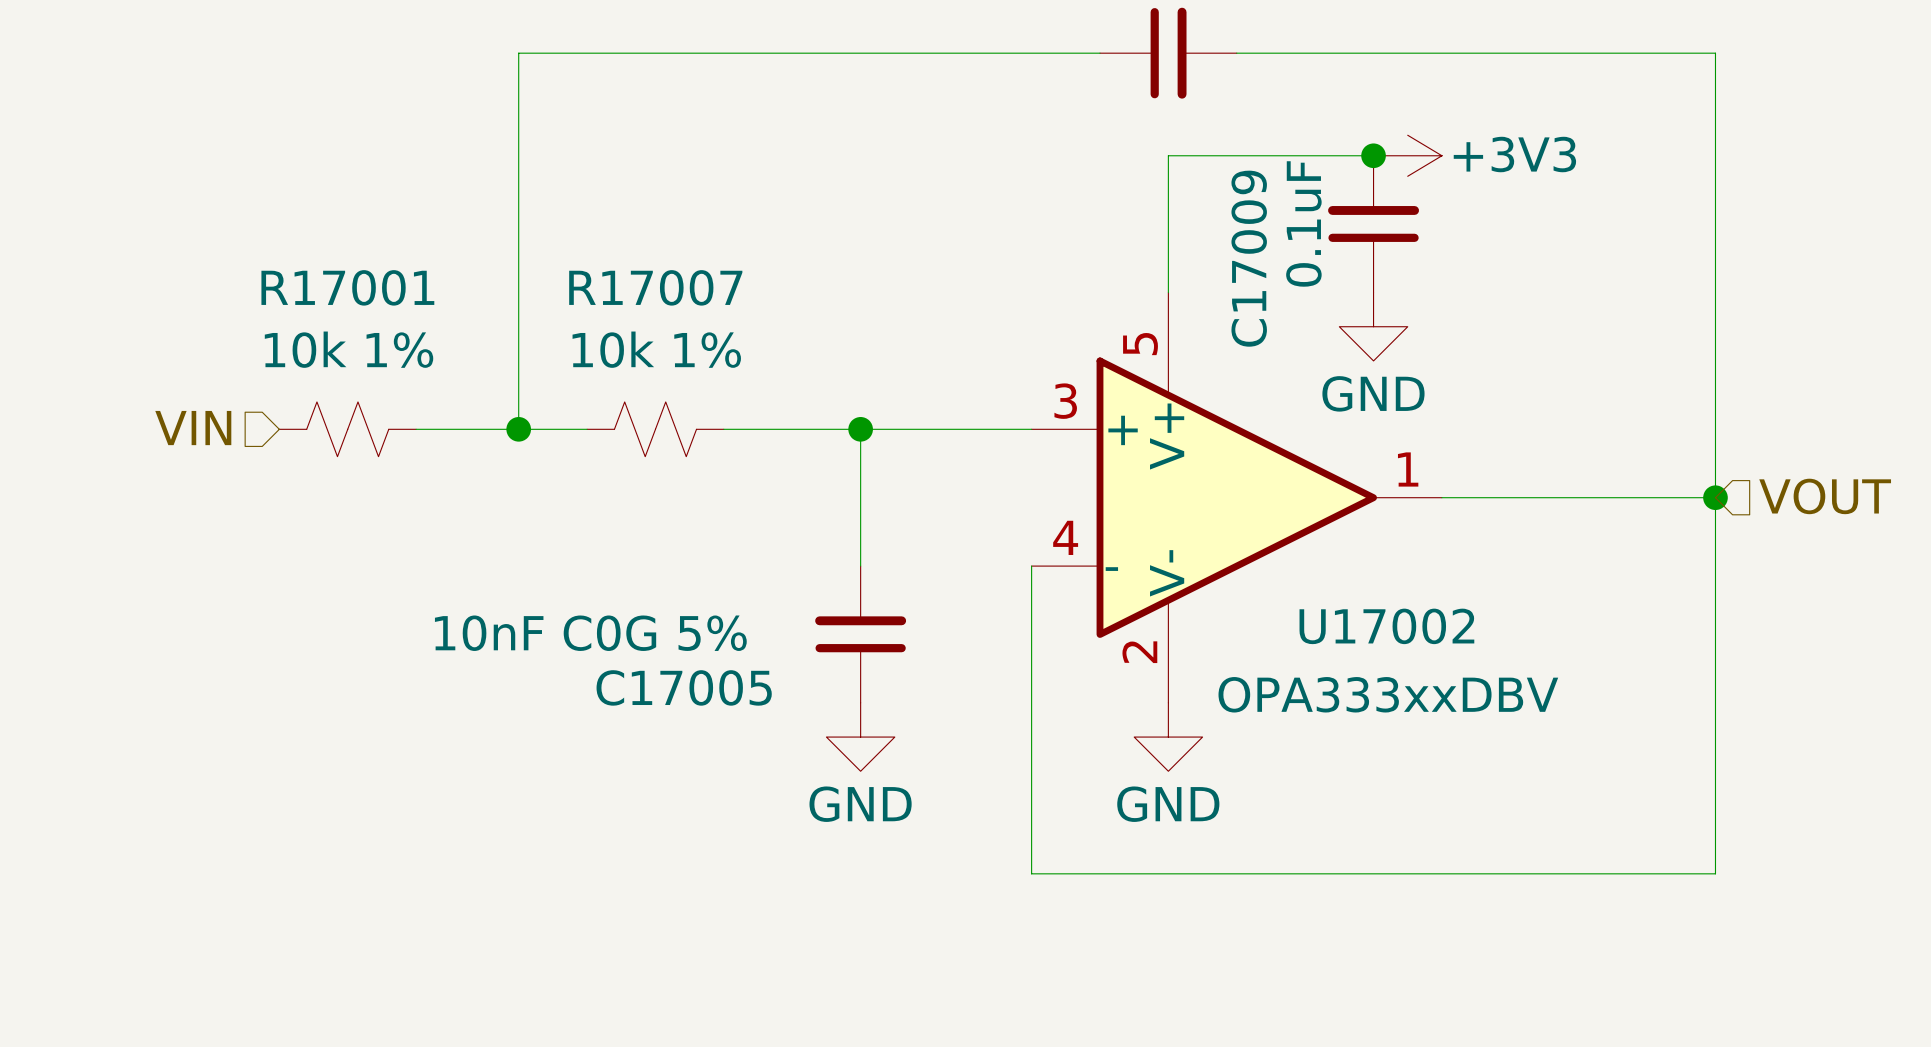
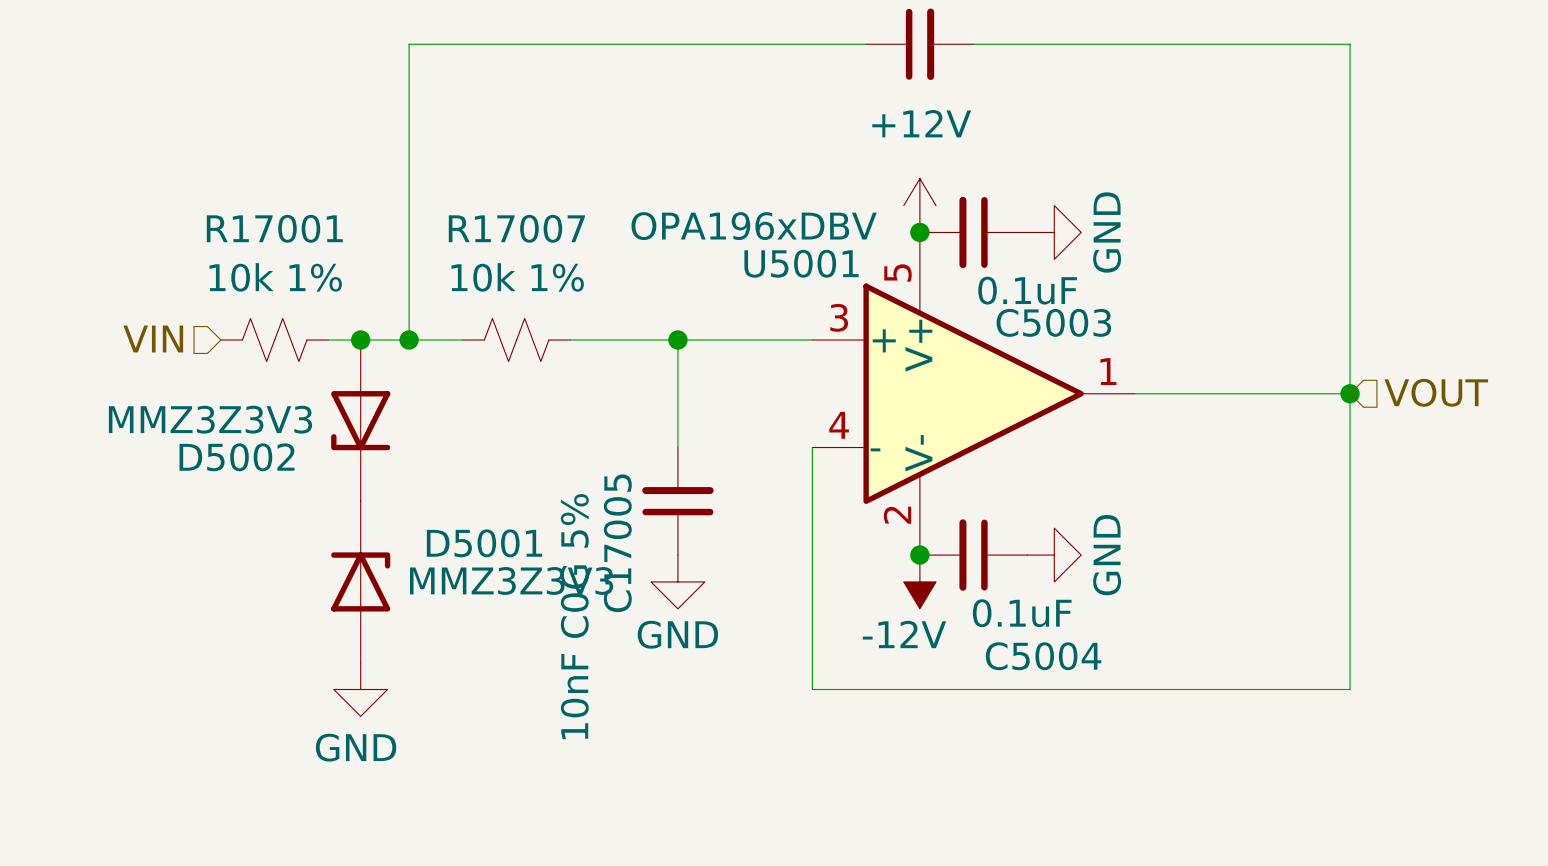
wire: (1373, 155) (1168, 155) (1168, 292) -> none
junction: (1373, 155) -> none
power symbol: +3V3 (1407, 155) -> none
C17009: 0.1uF (1373, 224) -> none
power symbol: none -> +12V (919, 205)
junction: none -> (919, 232)
C5003: none -> 0.1uF (973, 232)
power symbol rotation: 0° (1373, 326) -> 90° counterclockwise (1054, 232)
power symbol position: GND (1373, 326) -> GND (1054, 232)
junction: none -> (360, 340)
D5002: none -> MMZ3Z3V3 (360, 420)
U17002 name: U17002 (1386, 626) -> U5001 (801, 263)
C17005 value rotation: 0° (590, 633) -> 90° counterclockwise (574, 616)
C17005 name rotation: 0° (684, 687) -> 90° counterclockwise (617, 543)
U17002 value: OPA333xxDBV (1388, 694) -> OPA196xDBV (754, 226)
junction: none -> (919, 555)
C5004: none -> 0.1uF (973, 555)
power symbol: none -> GND (1054, 555)
D5001: none -> MMZ3Z3V3 (360, 581)
power symbol: GND (1168, 737) -> -12V (919, 581)
power symbol: none -> GND (360, 689)

